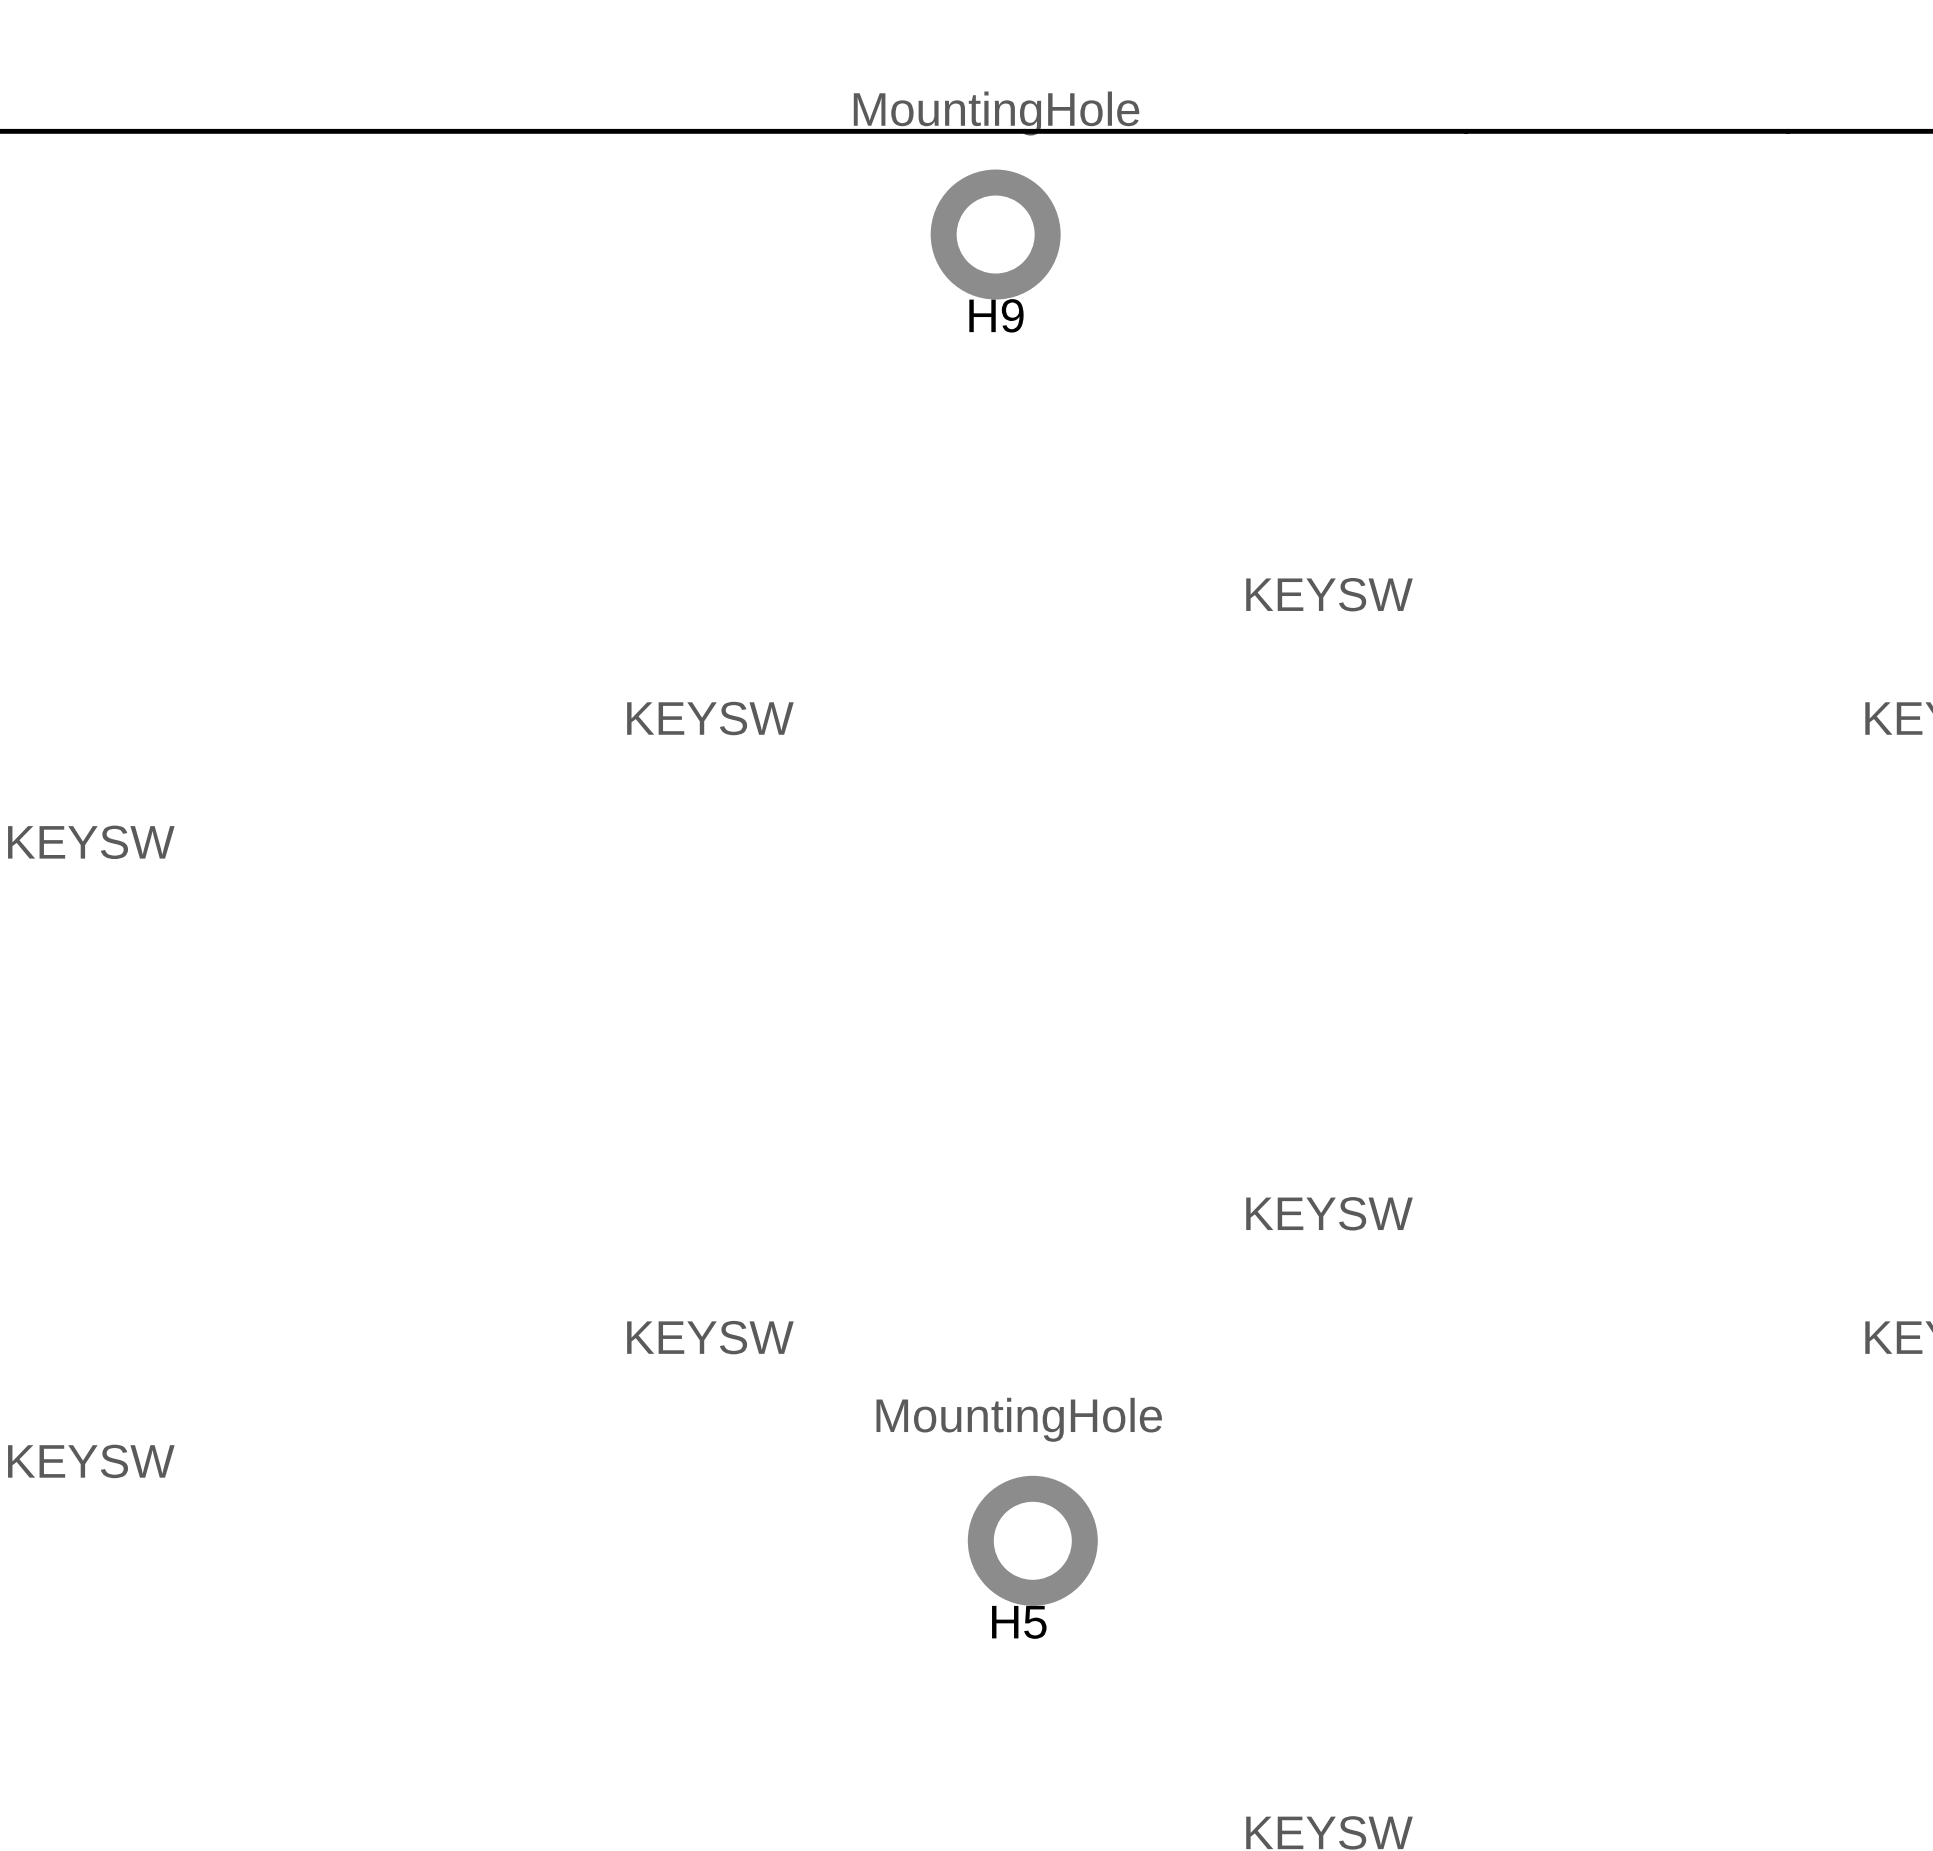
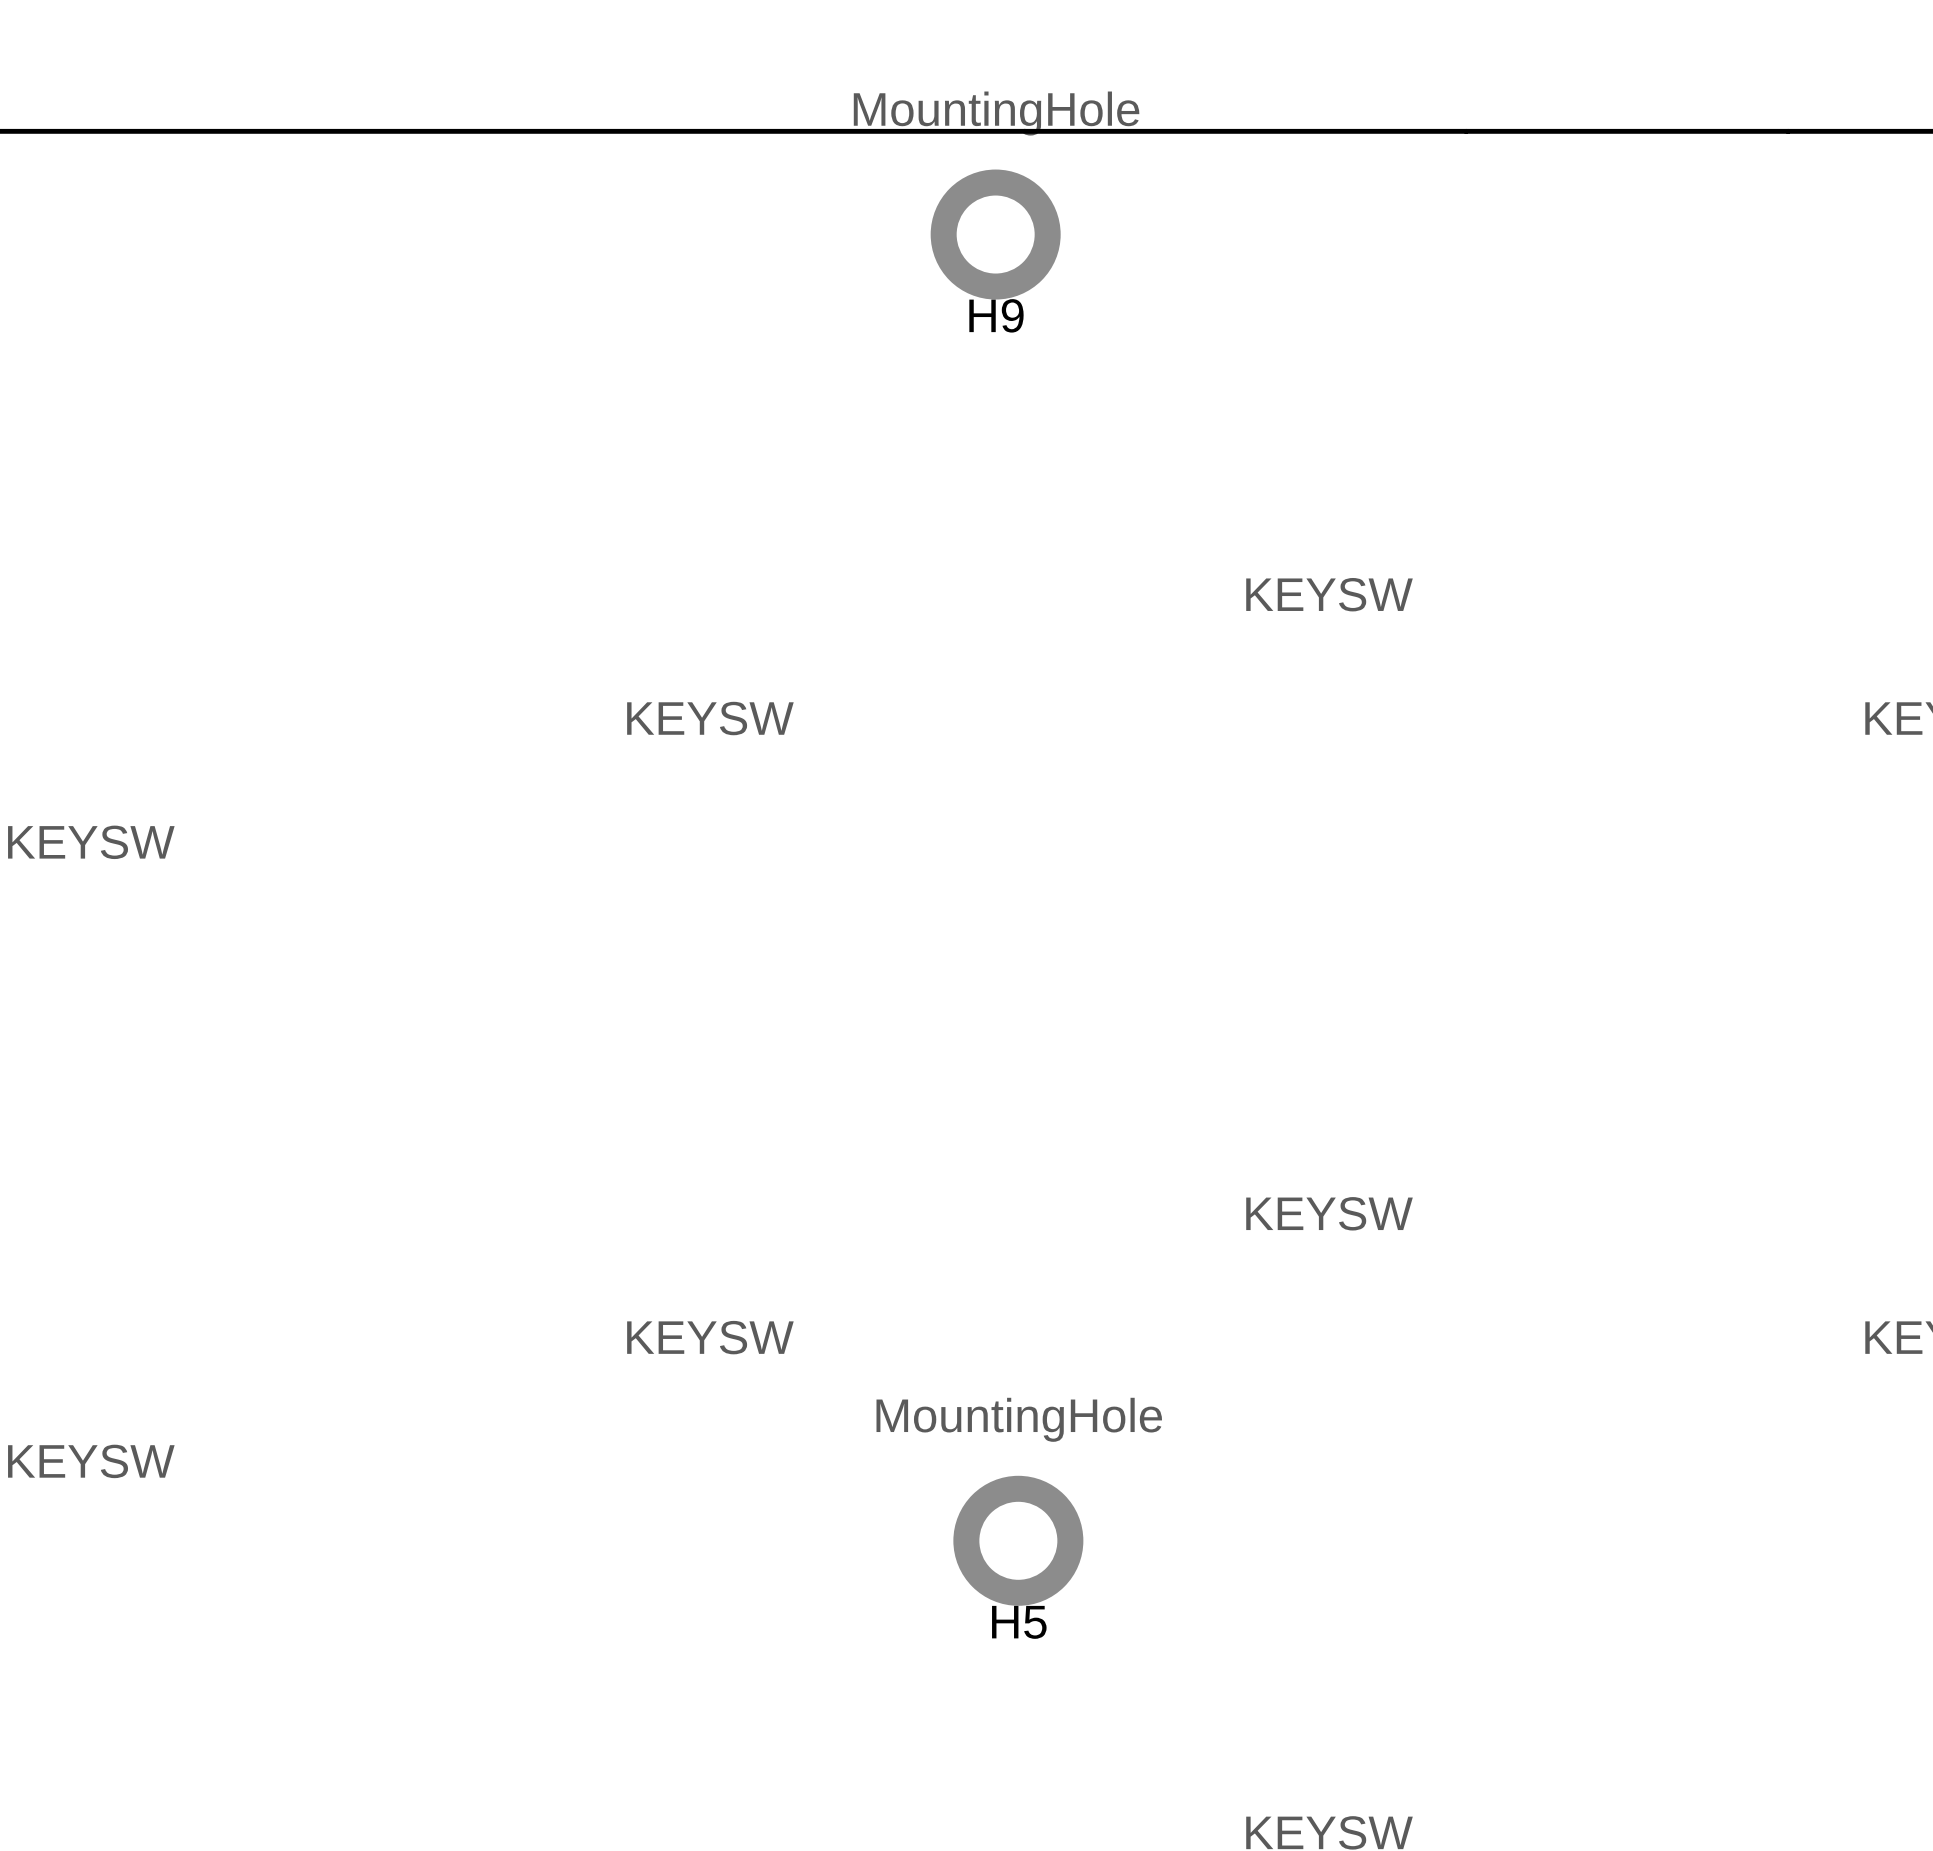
H5 position: (1032, 1540) -> (1018, 1540)

